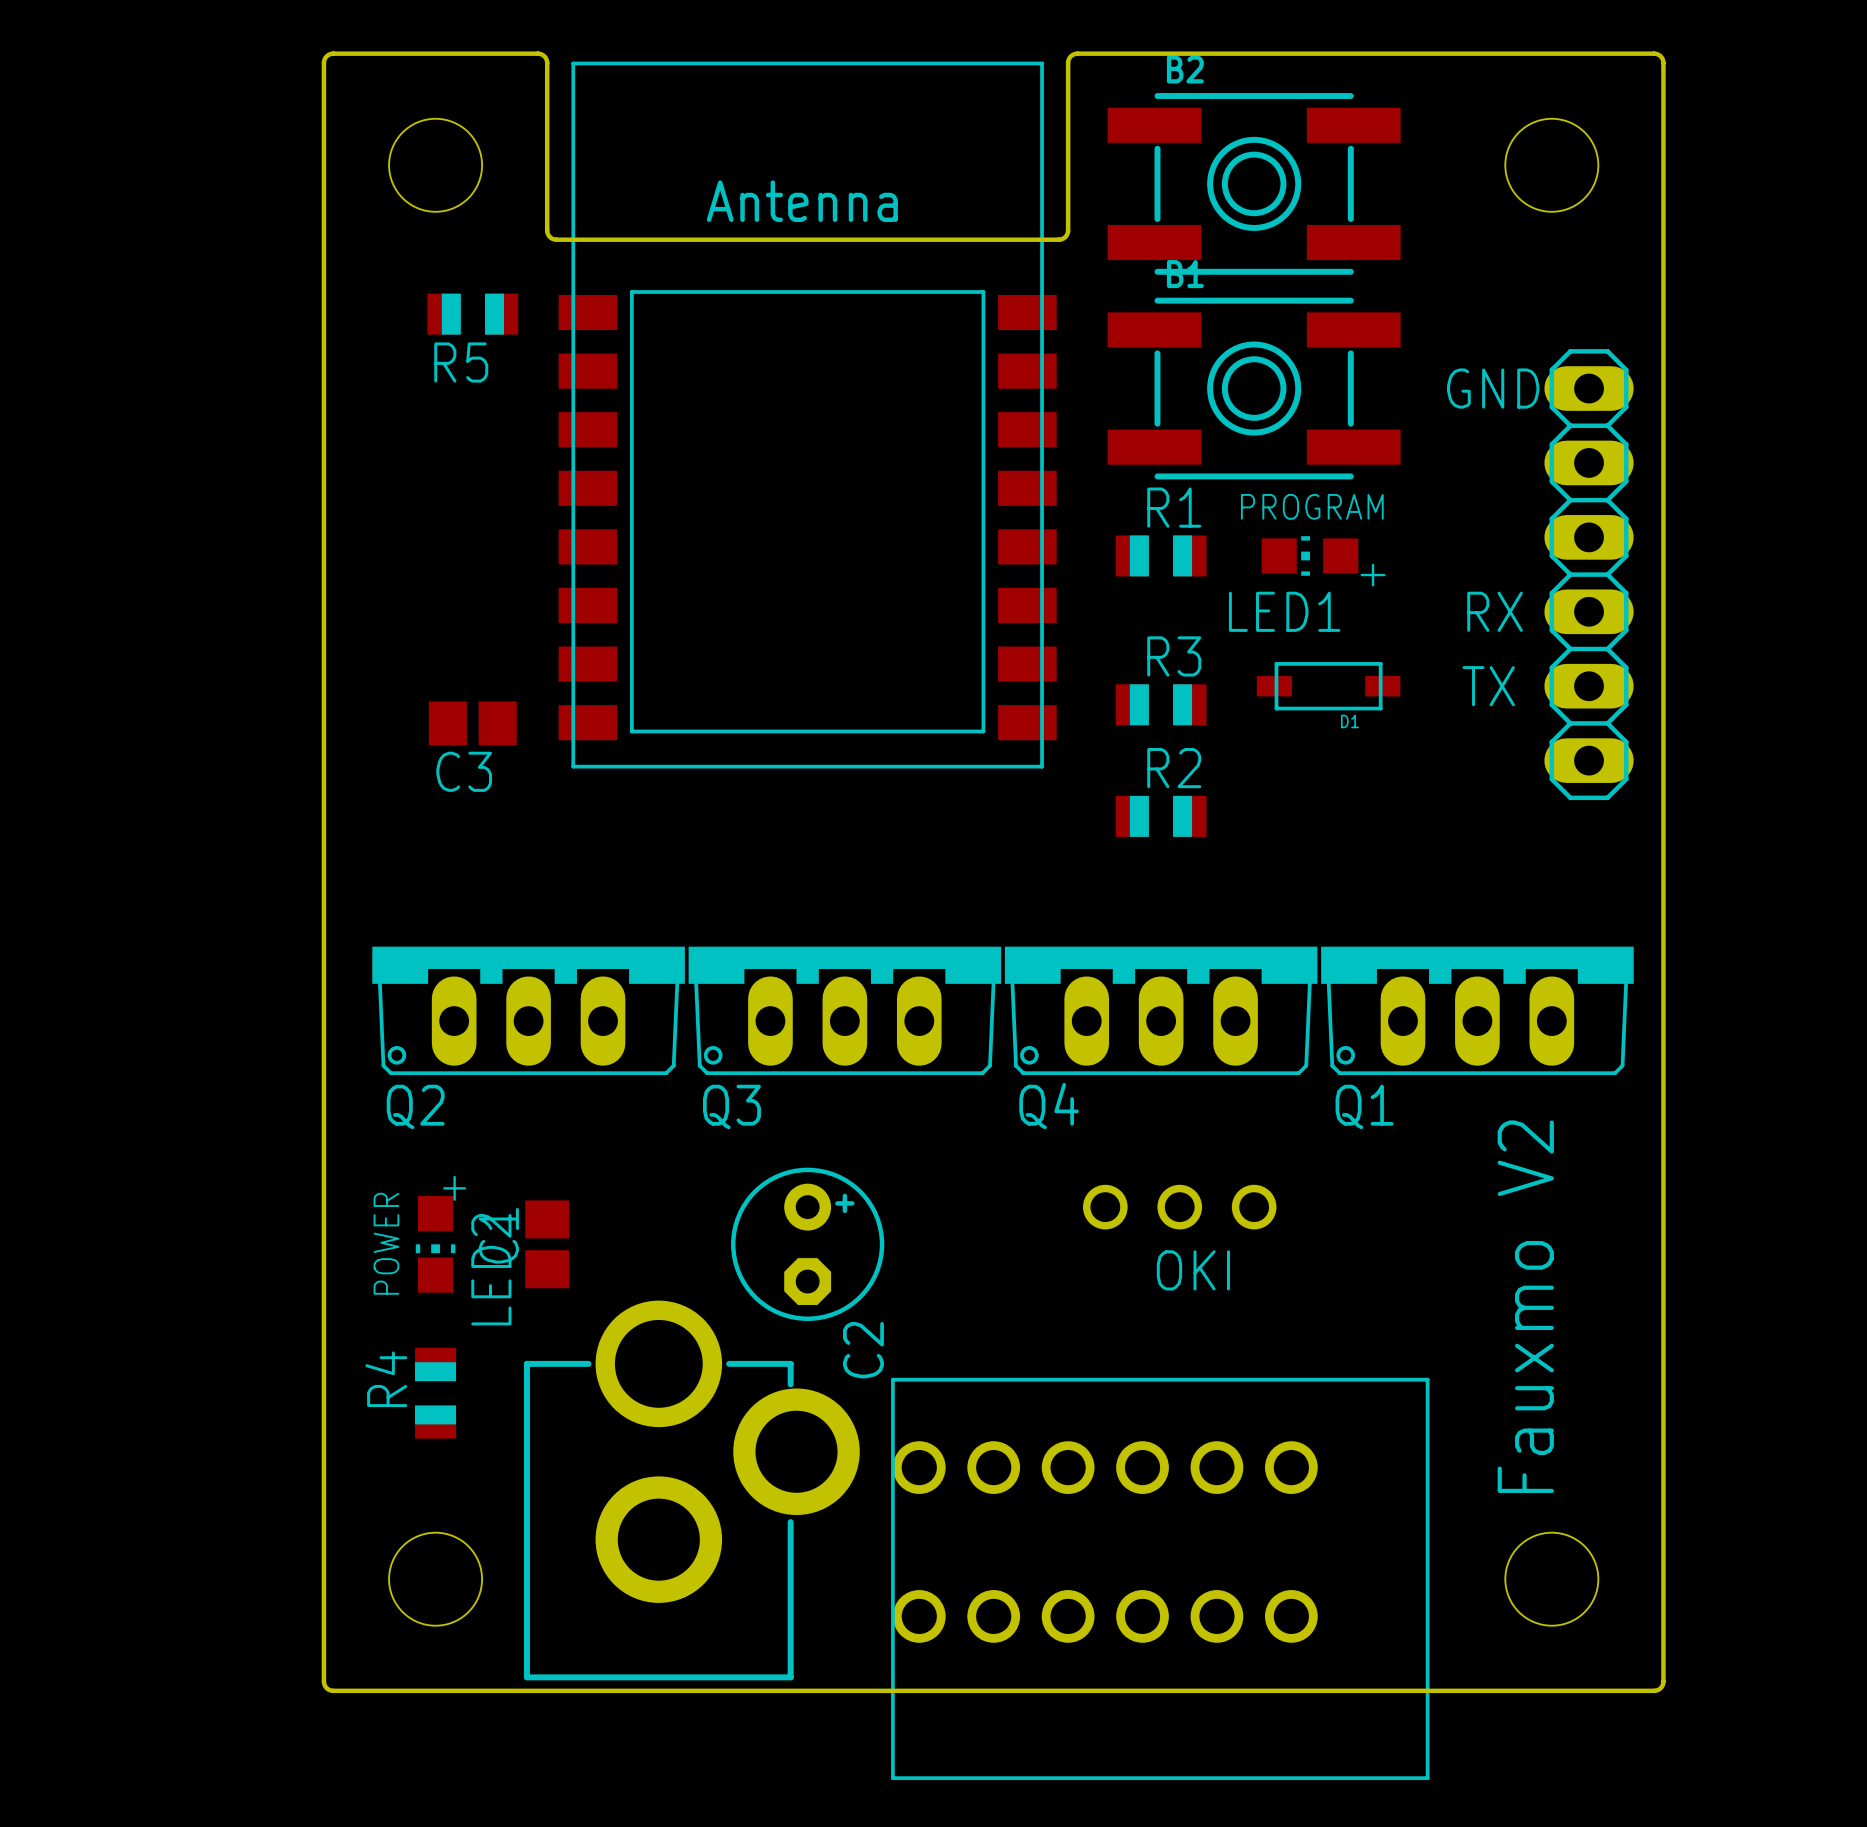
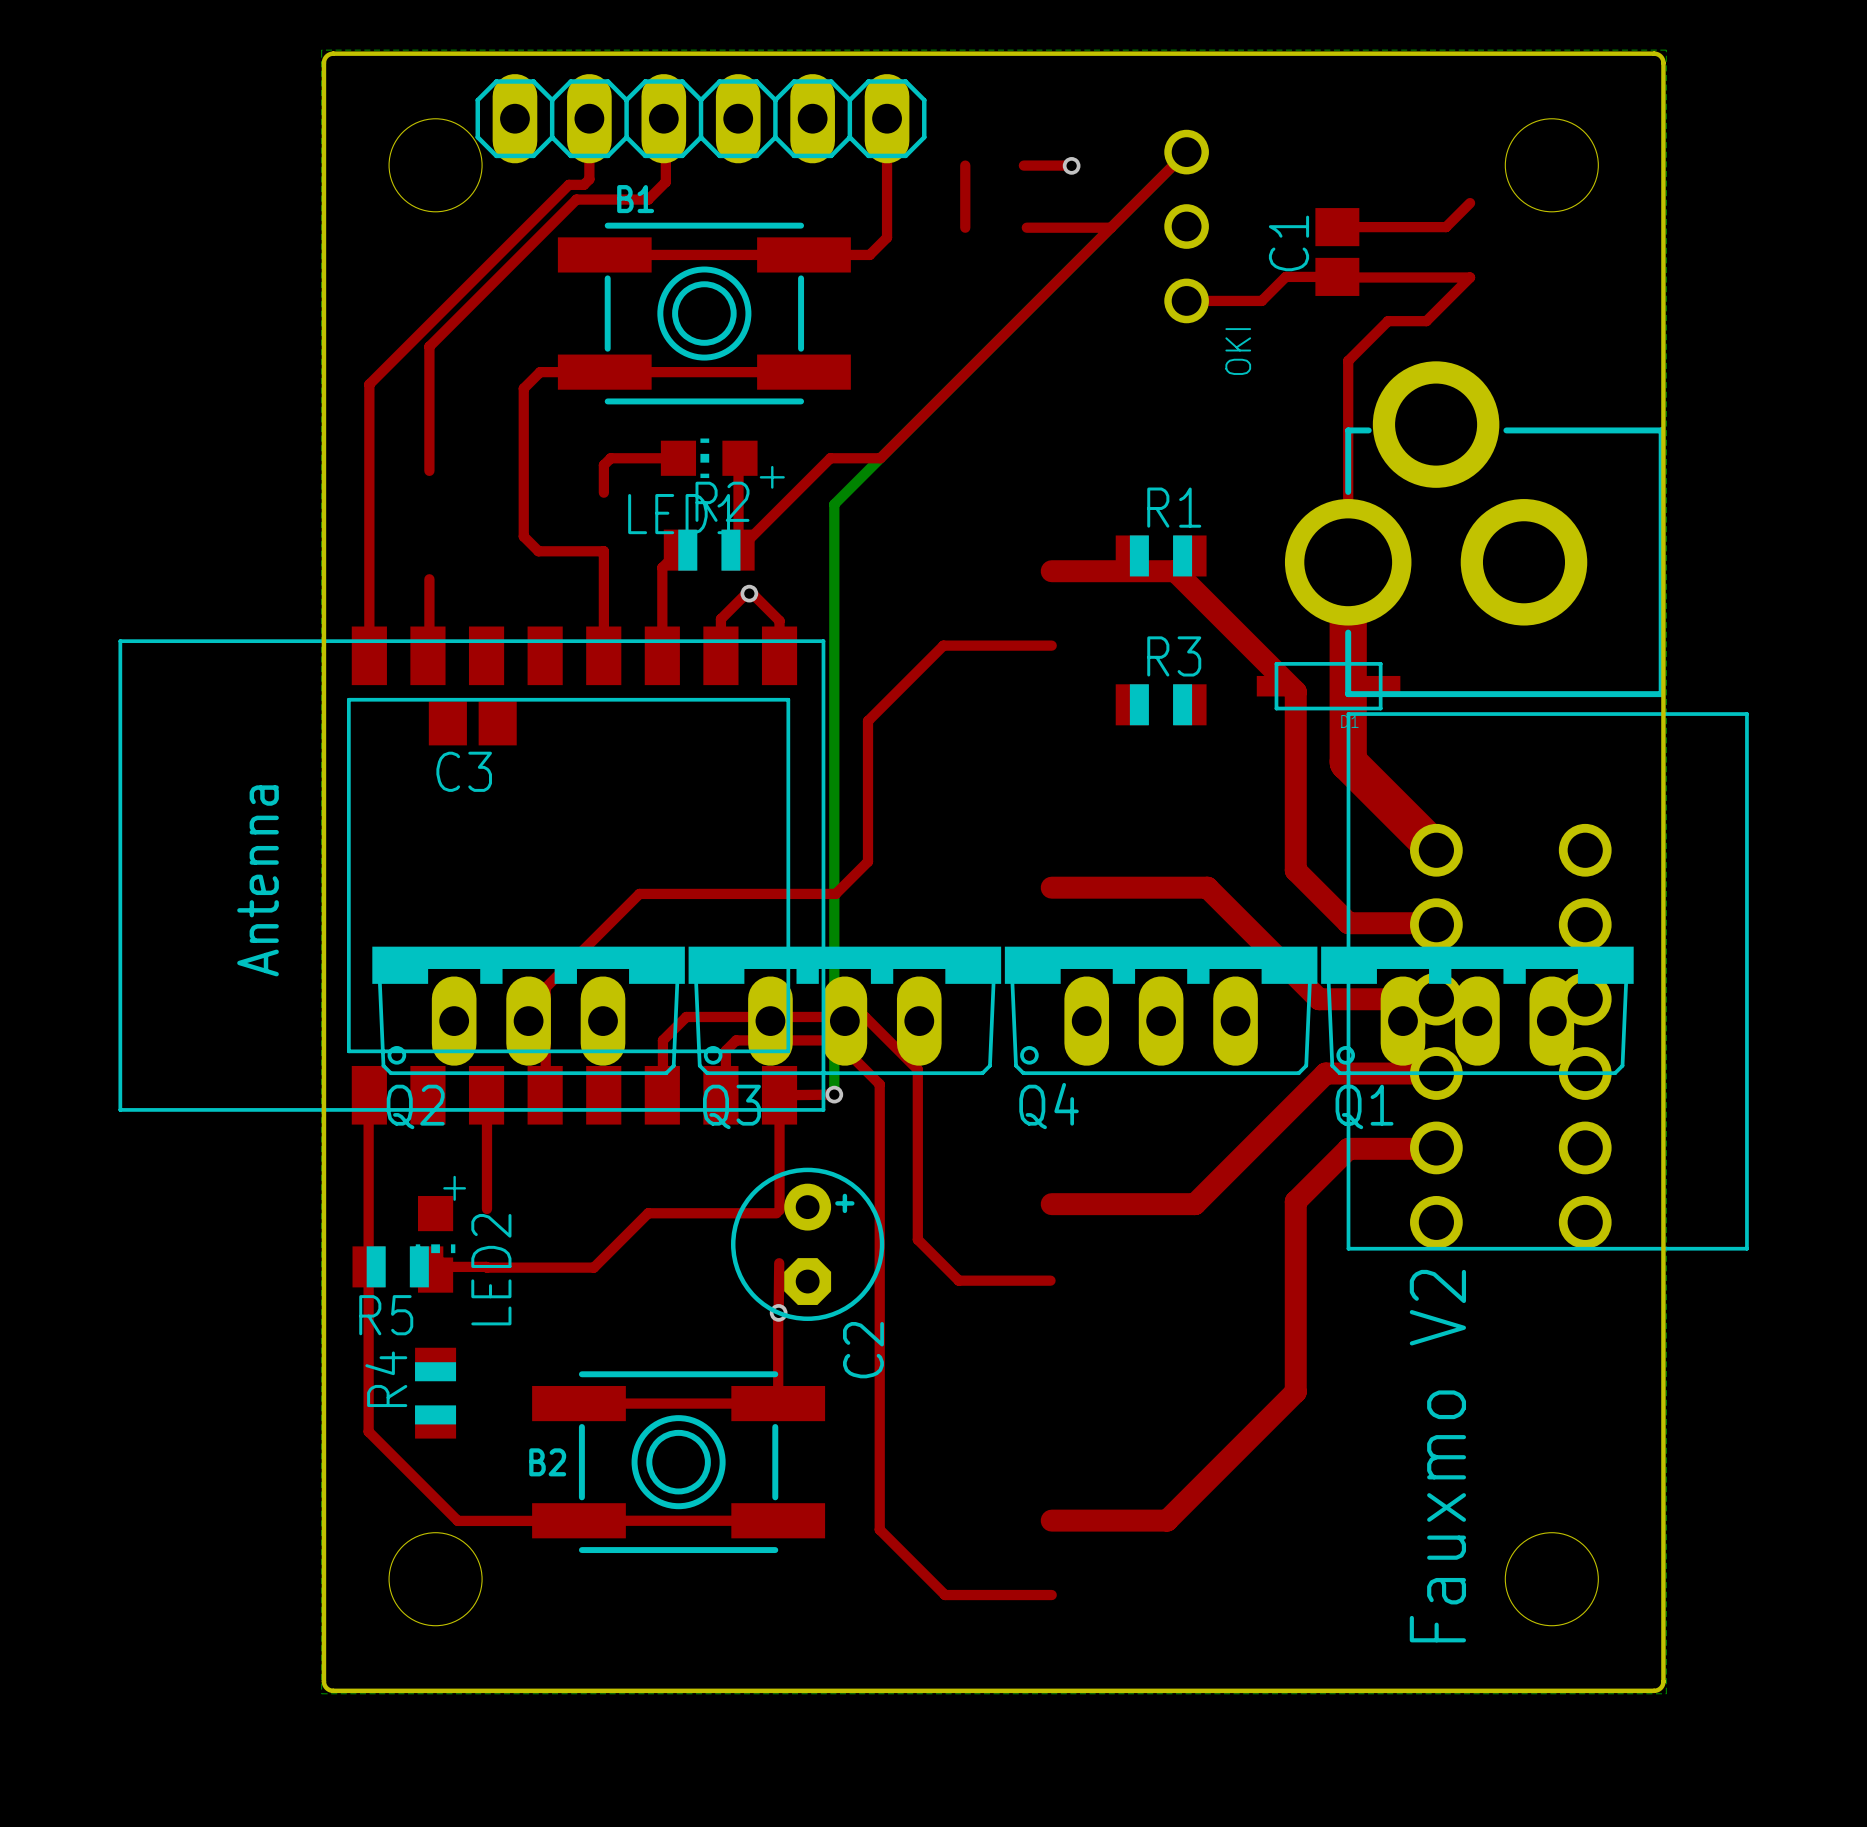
bottom zone outline: none -> (321, 50) (321, 1693) (1666, 1693) (1666, 50) (321, 50)
board edge: (537, 53) (544, 56) (547, 62) (547, 231) (550, 237) (556, 239) (1062, 238) (1066, 235) (1068, 230) (1068, 61) (1071, 55) (1077, 53) -> (537, 53) (1077, 53)
B2 name position: B2 (1185, 69) -> B2 (547, 1462)
top track: none -> (589, 118) (589, 179) (583, 184) (568, 184) (369, 384) (369, 655)
top track: none -> (663, 118) (665, 120) (665, 181) (648, 199) (576, 199) (429, 346) (429, 470)
part: none -> (701, 118)
top track: none -> (887, 118) (887, 237) (869, 254) (604, 254)
top track: none -> (1184, 150) (1186, 152) (880, 458) (830, 458) (738, 550) (739, 458)
bottom track: none -> (1186, 152) (834, 504) (834, 1094)
top track: none -> (965, 165) (965, 227)
top track: none -> (1023, 165) (1071, 165)
via: none -> (1071, 165)
B2 position: (1254, 183) -> (678, 1462)
top track: none -> (1470, 203) (1446, 227) (1337, 227)
OKI: none -> (1186, 226)
top track: none -> (1026, 227) (1111, 227)
top track: none -> (1186, 300) (1261, 300) (1285, 276) (1470, 277) (1426, 321) (1388, 321) (1348, 361) (1348, 762) (1436, 850)
R5 position: (472, 314) -> (397, 1266)
top track: none -> (803, 372) (540, 372) (523, 388) (523, 536) (538, 551) (603, 551) (603, 655)
B1 position: (1254, 388) -> (704, 313)
text: GND (1493, 388) -> none
part rotation: 0° (807, 415) -> 90° counterclockwise (471, 875)
part position: (807, 415) -> (471, 875)
top track: none -> (678, 458) (610, 458) (603, 465) (603, 492)
text: PROGRAM (1312, 506) -> none
part: none -> (1474, 529)
top track: none -> (679, 550) (662, 567) (662, 655)
LED1 position: (1309, 555) -> (709, 458)
top track: none -> (1051, 571) (1175, 571) (1295, 691) (1295, 870) (1348, 923) (1436, 924)
part: (1589, 574) -> none
top track: none -> (429, 579) (427, 655) (429, 654)
via: none -> (749, 593)
text: RX (1495, 611) -> none
top track: none -> (1051, 645) (943, 645) (868, 721) (868, 861) (835, 893) (639, 893) (545, 987) (545, 1118) (545, 1095)
top track: none -> (720, 655) (720, 619) (746, 593) (752, 593) (779, 620) (779, 655)
text: TX (1488, 686) -> none
R2 position: (1161, 816) -> (709, 550)
top track: none -> (1051, 887) (1207, 887) (1319, 999) (1436, 999)
top track: none -> (1435, 1072) (1325, 1073) (1195, 1204) (1051, 1204)
top track: none -> (720, 1073) (720, 1095) (725, 1090) (725, 1050) (736, 1040) (835, 1040) (879, 1084) (879, 1529) (945, 1595) (1051, 1595)
top track: none -> (834, 1094) (779, 1095) (779, 1210)
via: none -> (834, 1094)
top track: none -> (369, 1095) (368, 1431) (457, 1520) (778, 1520)
top track: none -> (486, 1095) (486, 1209)
top track: none -> (662, 1095) (662, 1118) (662, 1040) (686, 1016) (865, 1016) (917, 1069) (917, 1239) (958, 1280) (1050, 1280) (1051, 1278)
top track: none -> (1436, 1147) (1348, 1148) (1295, 1201) (1295, 1391) (1167, 1520) (1051, 1520)
OKI: (1179, 1207) -> none
top track: none -> (779, 1210) (776, 1213) (648, 1213) (593, 1267) (427, 1266)
text: POWER (386, 1243) -> none
C1 position: (547, 1244) -> (1337, 252)
top track: none -> (779, 1263) (778, 1403) (578, 1403)
text position: Fauxmo V2 (1525, 1306) -> Fauxmo V2 (1437, 1456)
via: none -> (778, 1312)
part: (691, 1490) -> none
part rotation: 0° (1160, 1578) -> 90° counterclockwise (1547, 981)
part position: (1160, 1578) -> (1547, 981)

